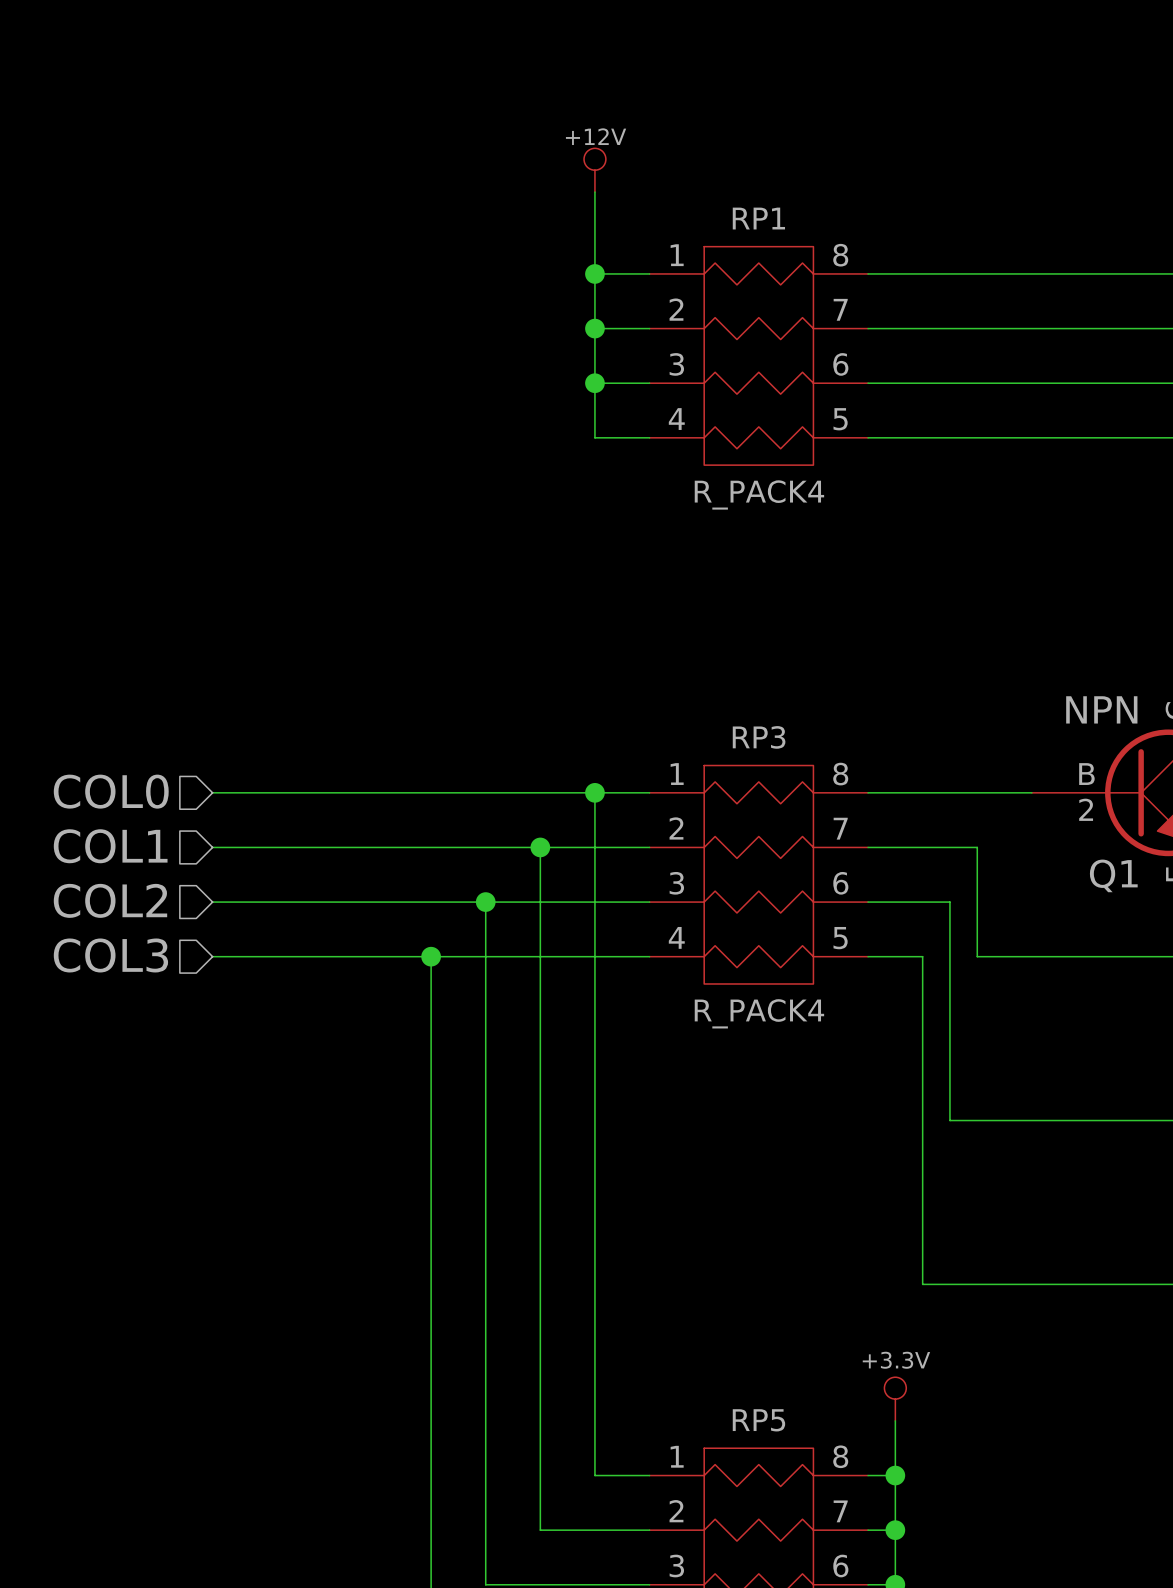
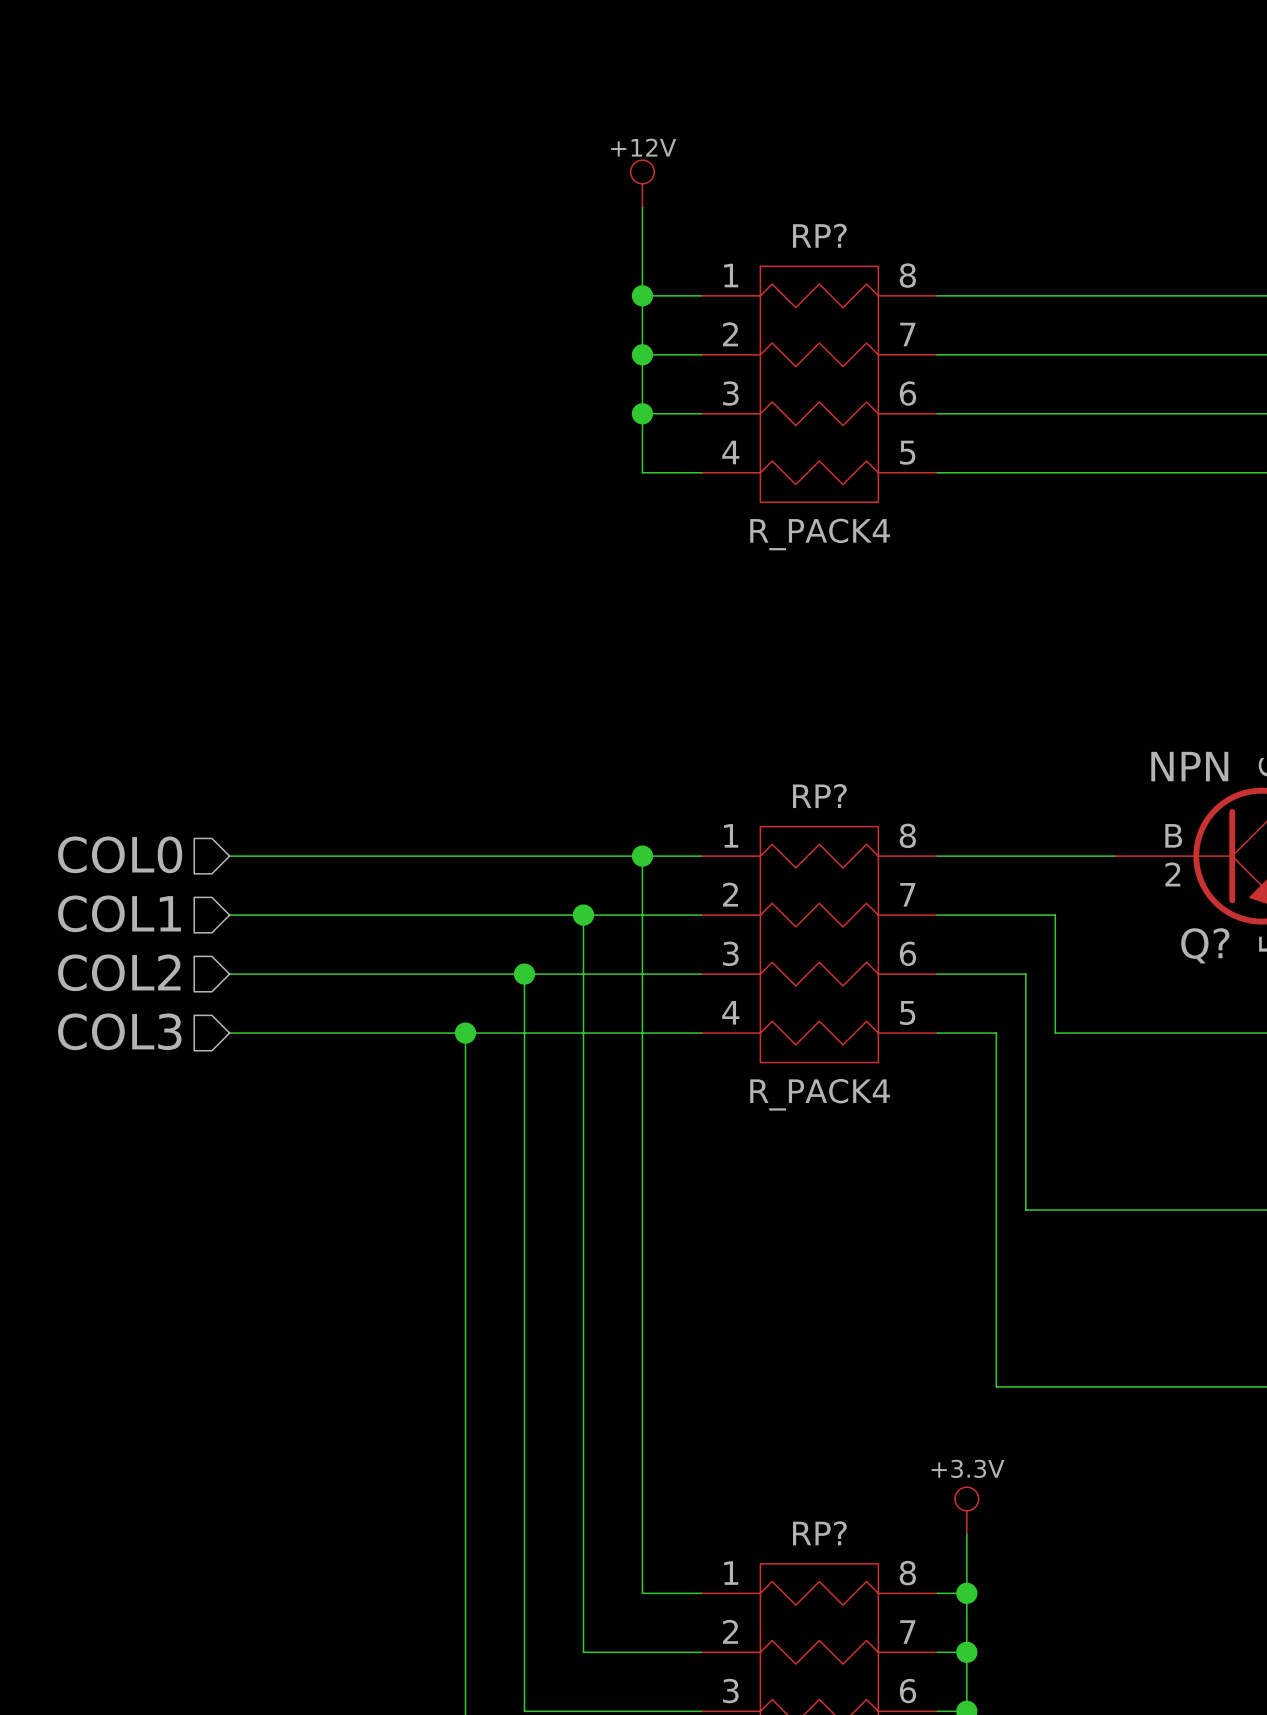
RP1 name: RP1 (758, 218) -> RP? (819, 235)
RP3 name: RP3 (759, 737) -> RP? (819, 796)
Q1 name: Q1 (1113, 875) -> Q? (1205, 945)
RP5 name: RP5 (758, 1420) -> RP? (819, 1533)

